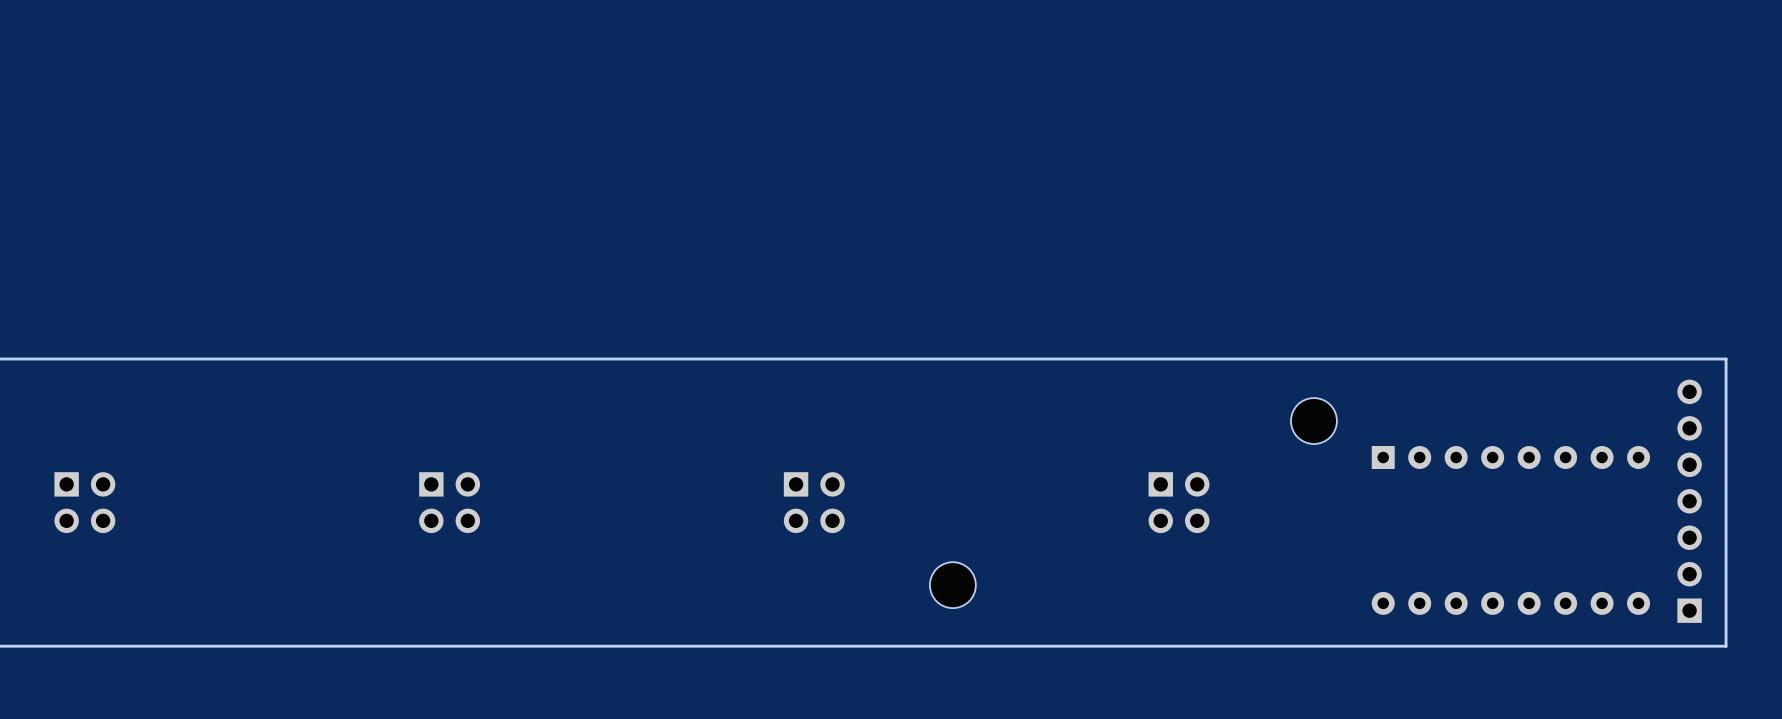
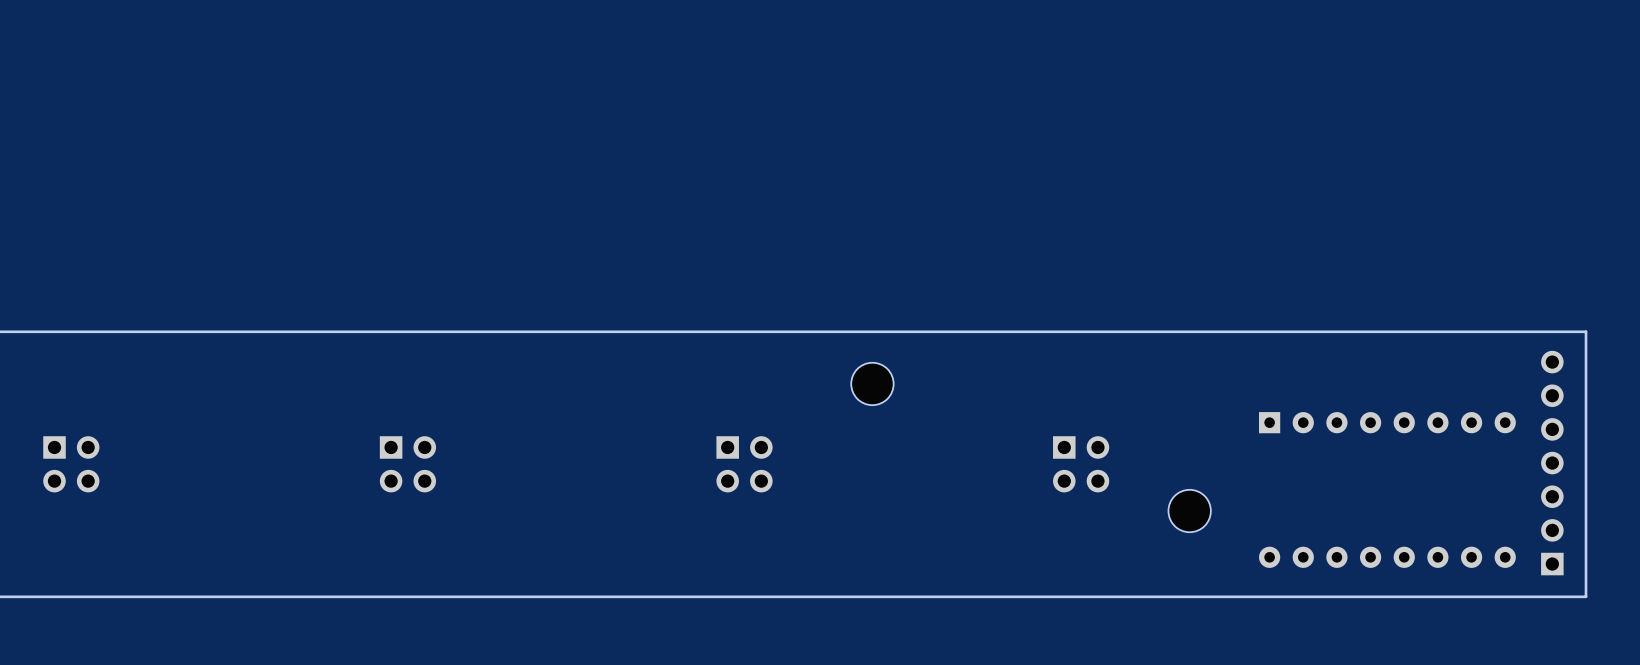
part position: (1313, 421) -> (1189, 511)
part position: (952, 585) -> (872, 383)

